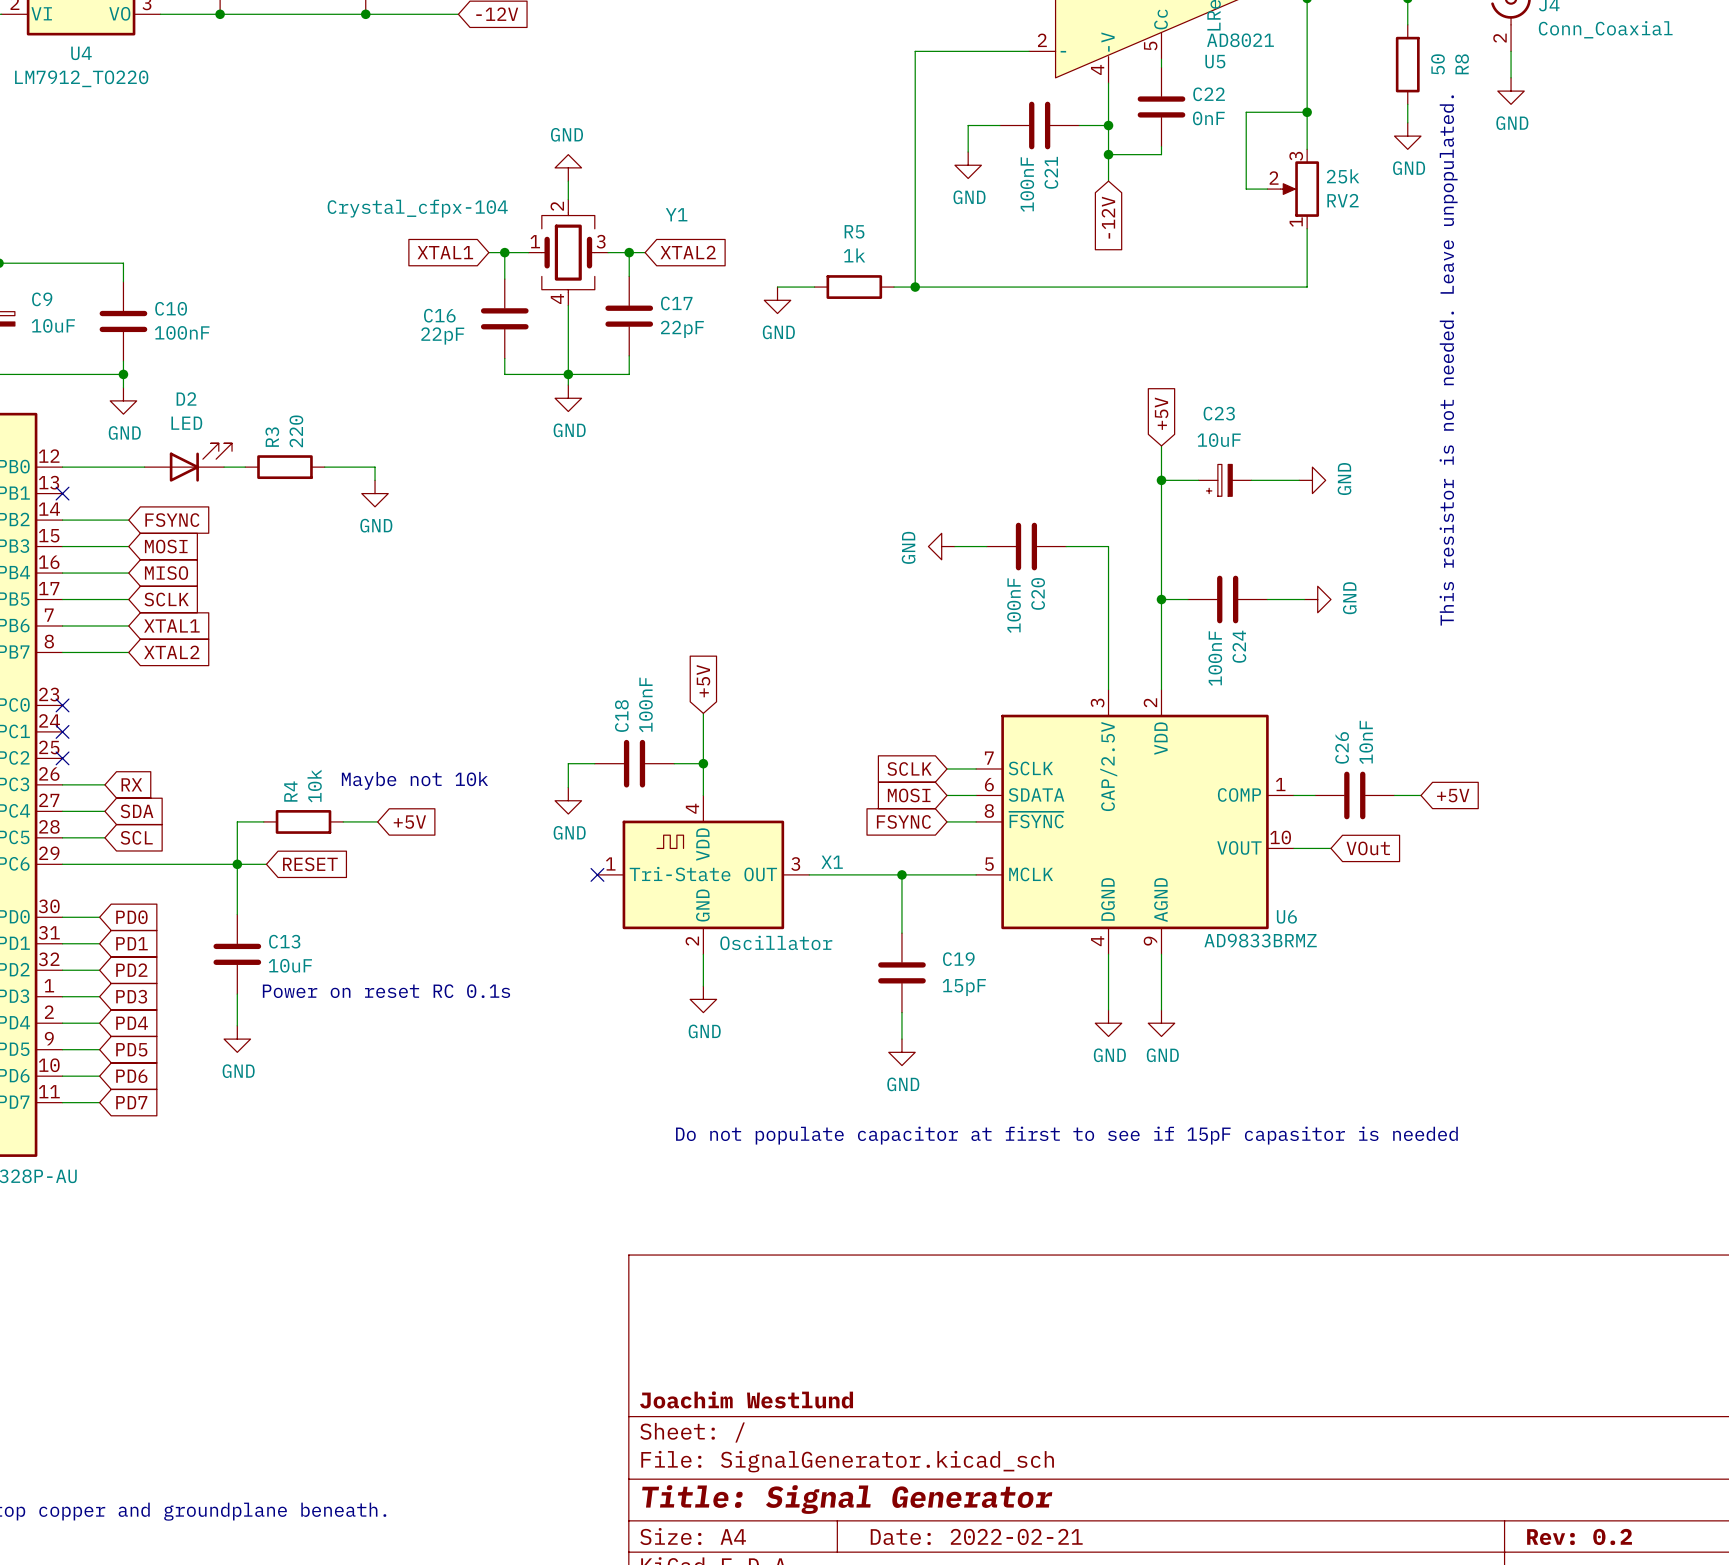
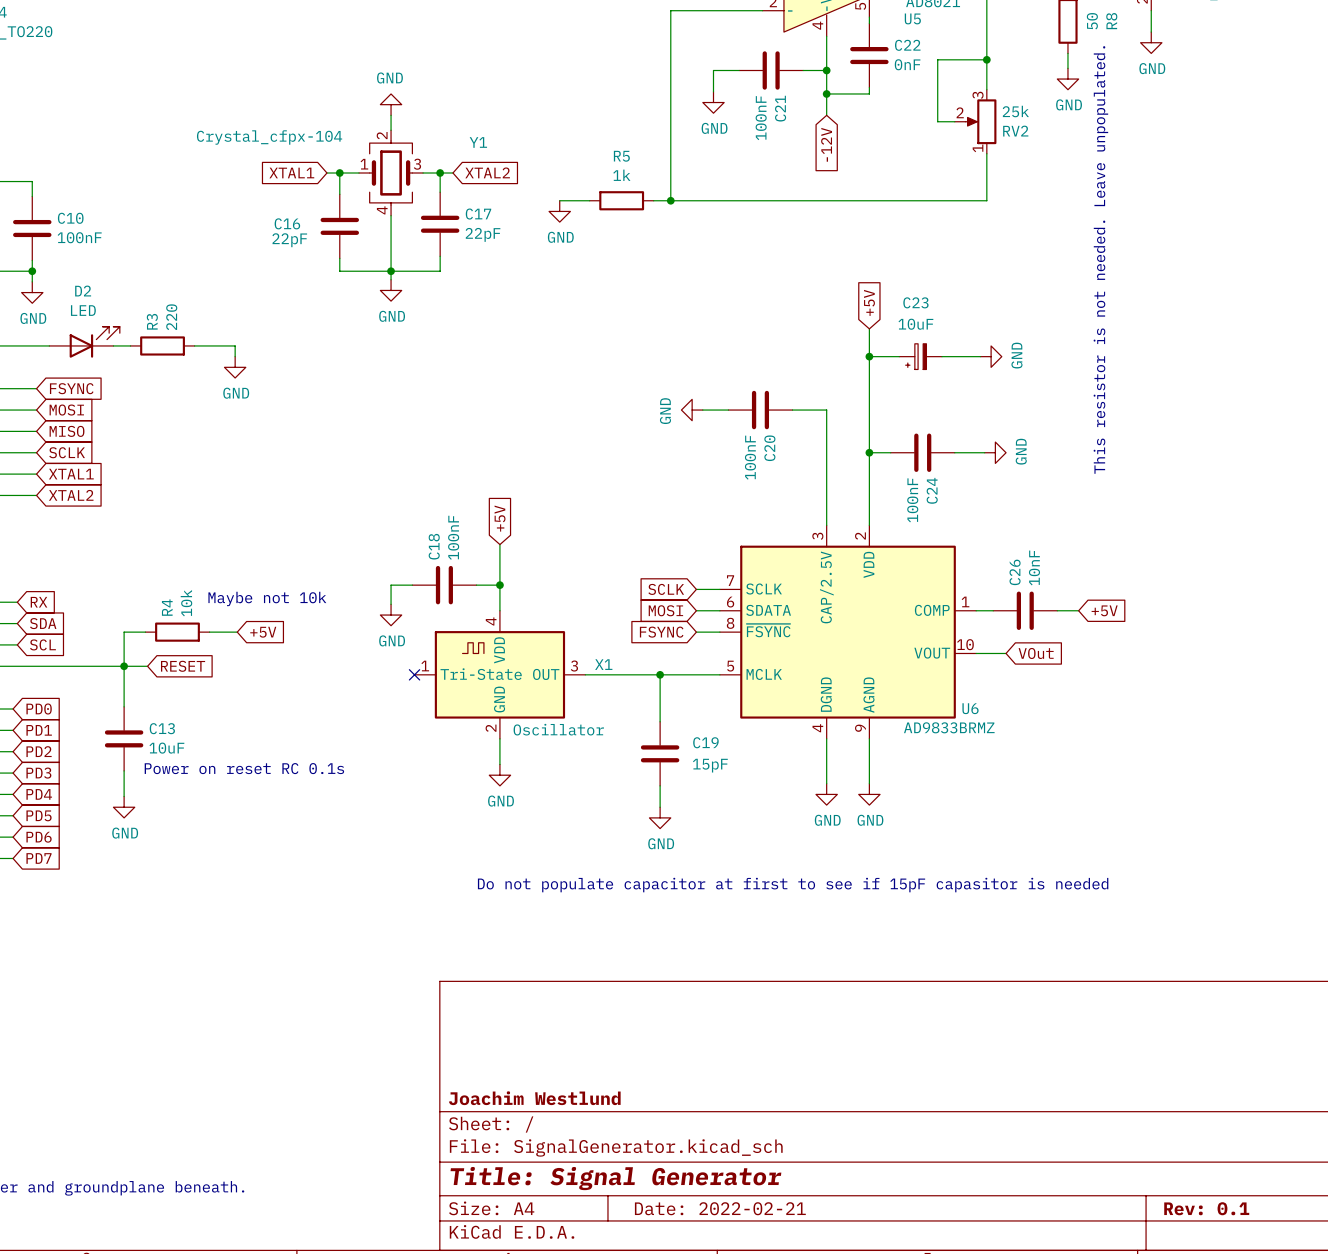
title block: Rev: 0.2 (1579, 1536) -> Rev: 0.1 (1206, 1208)

